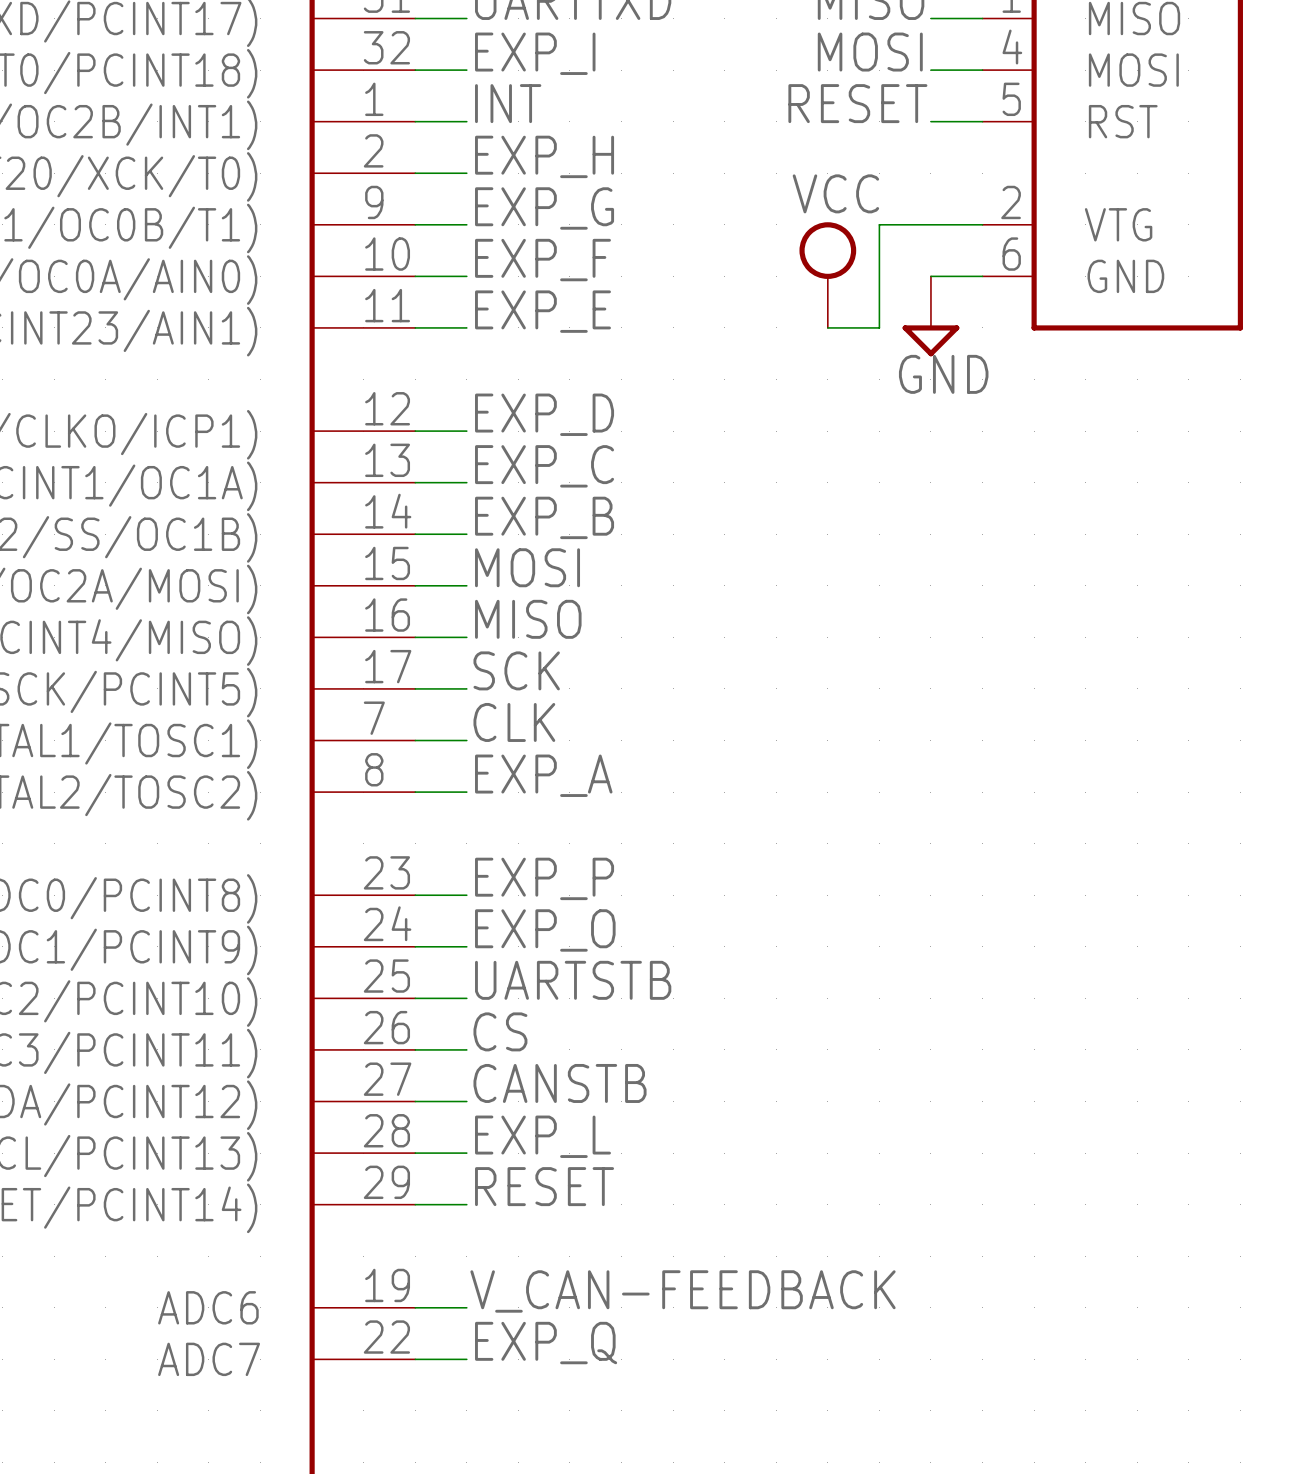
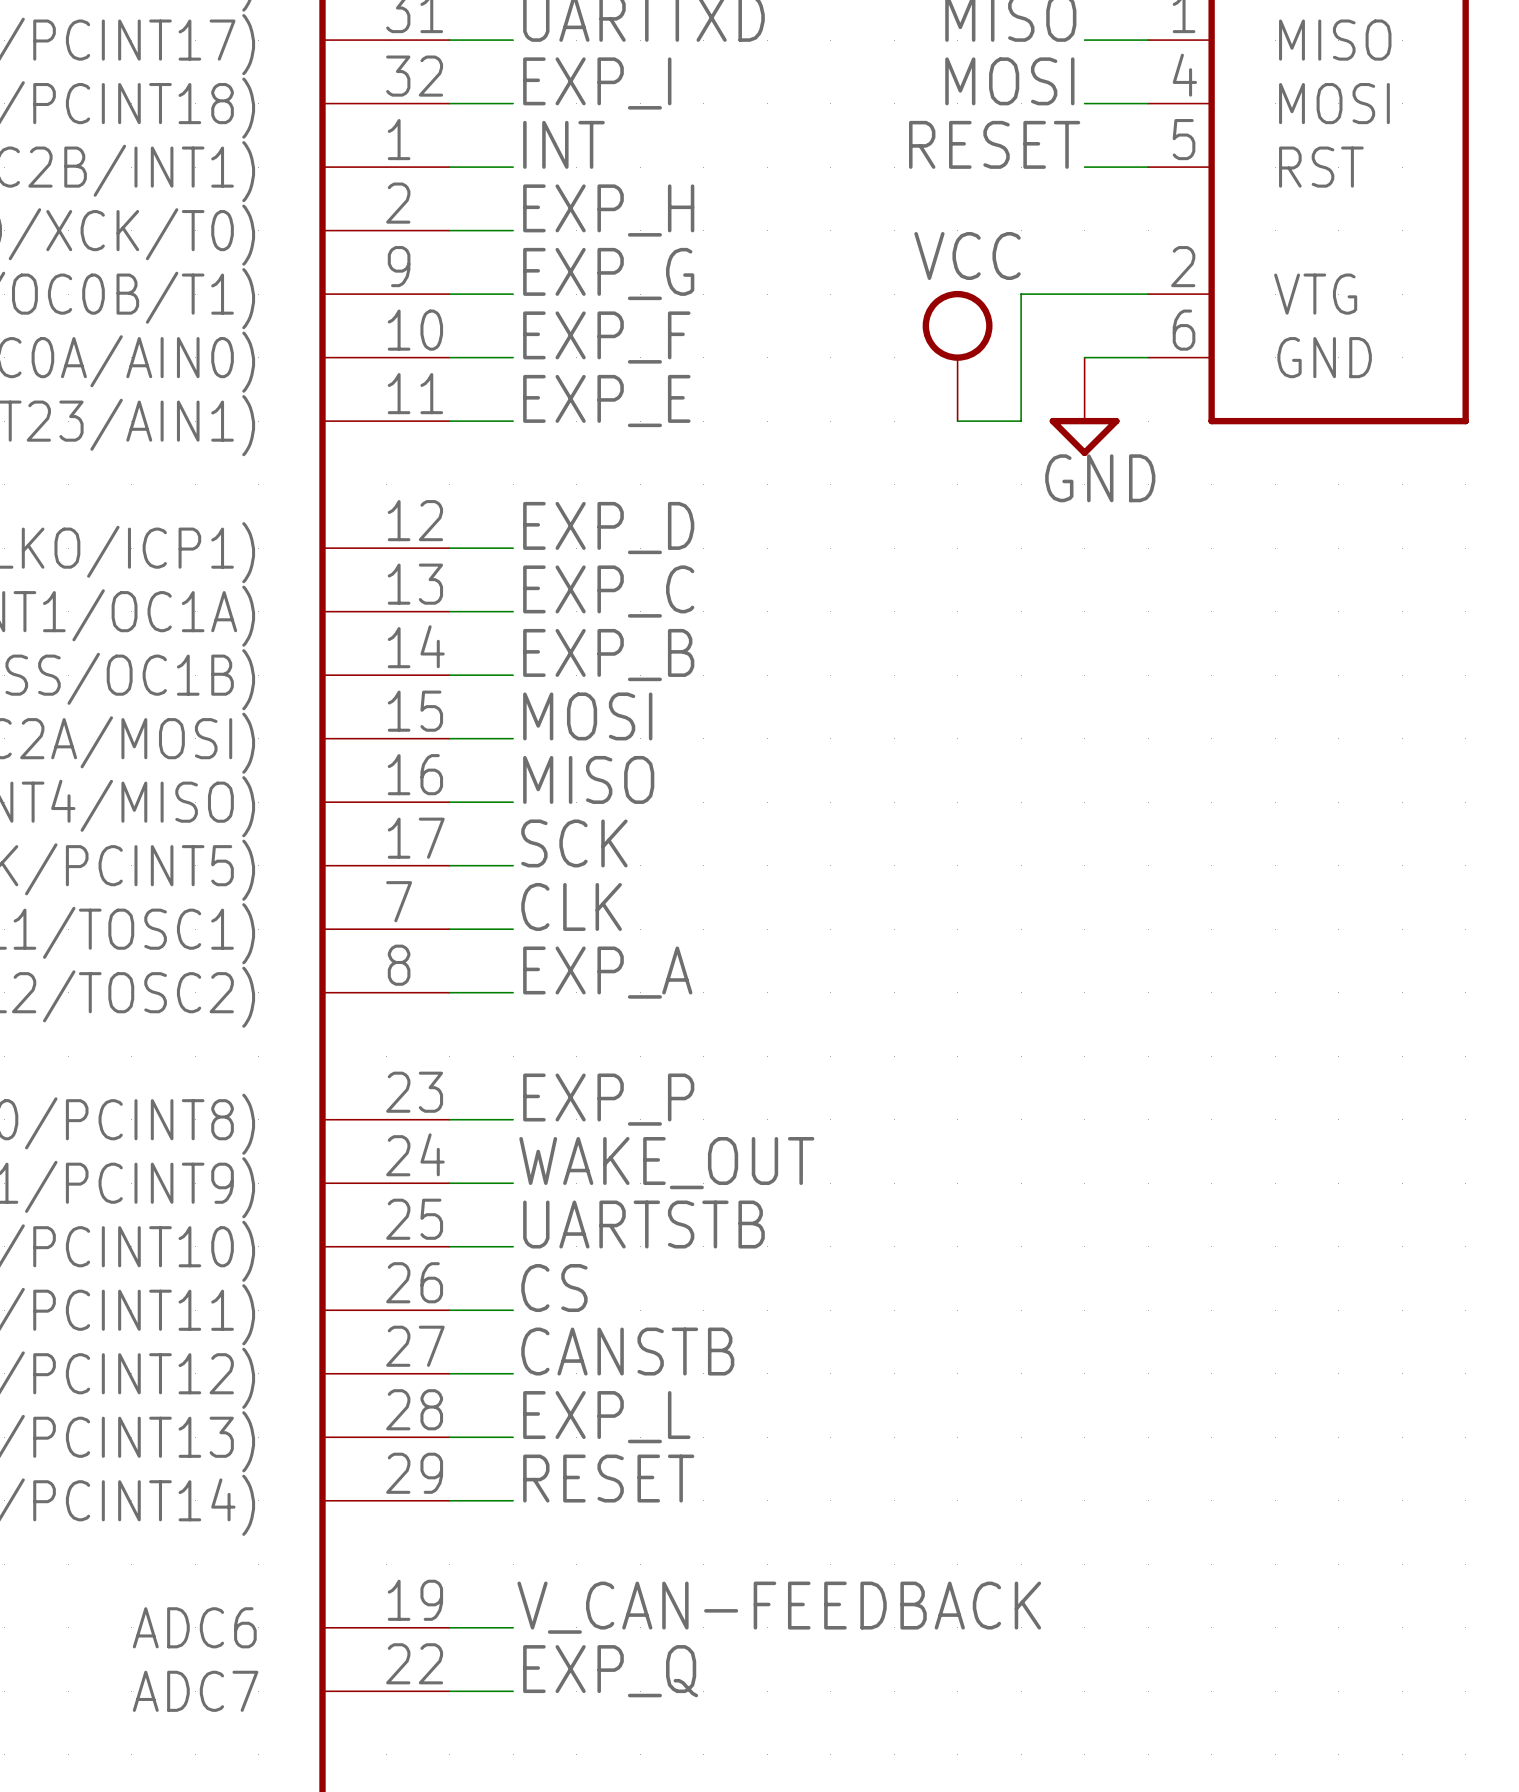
label: EXP_O (545, 930) -> WAKE_OUT (666, 1163)

